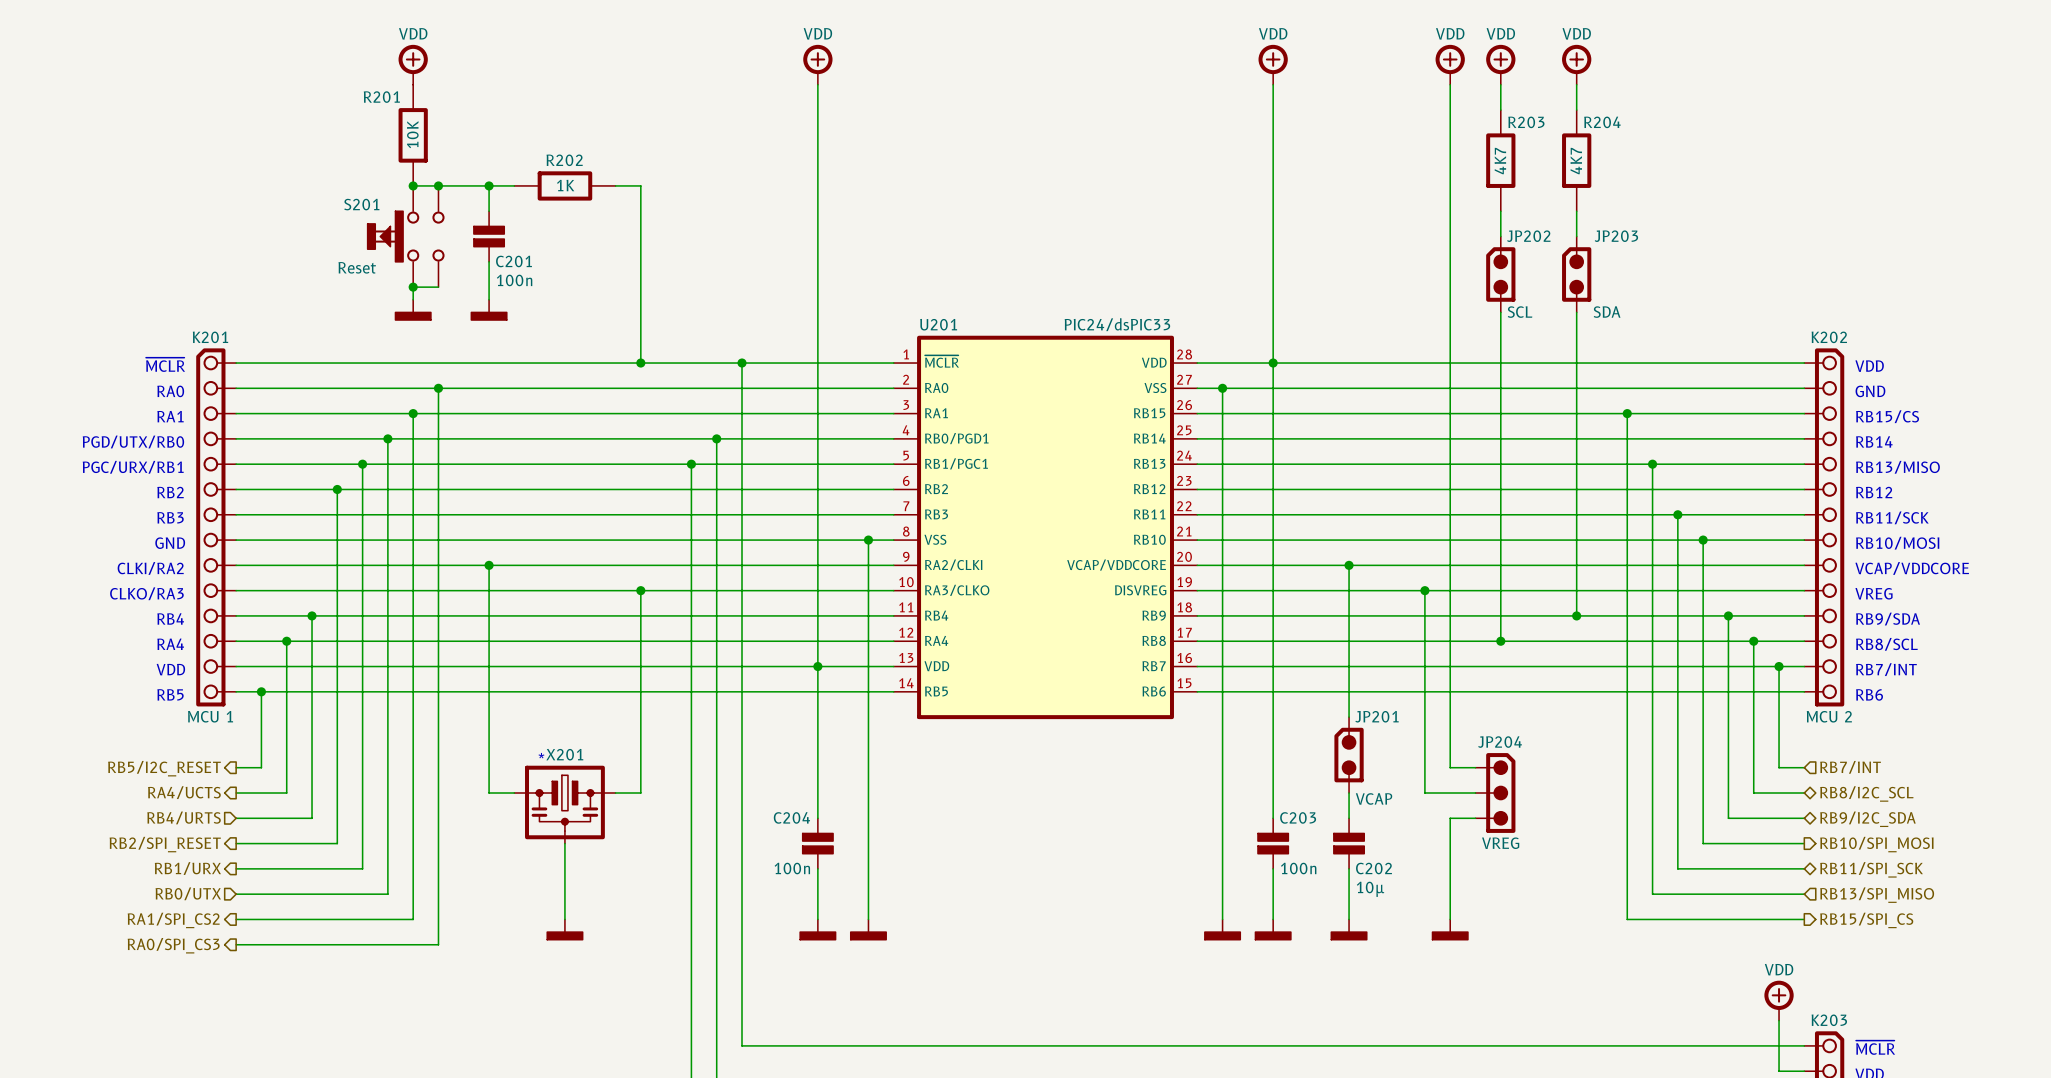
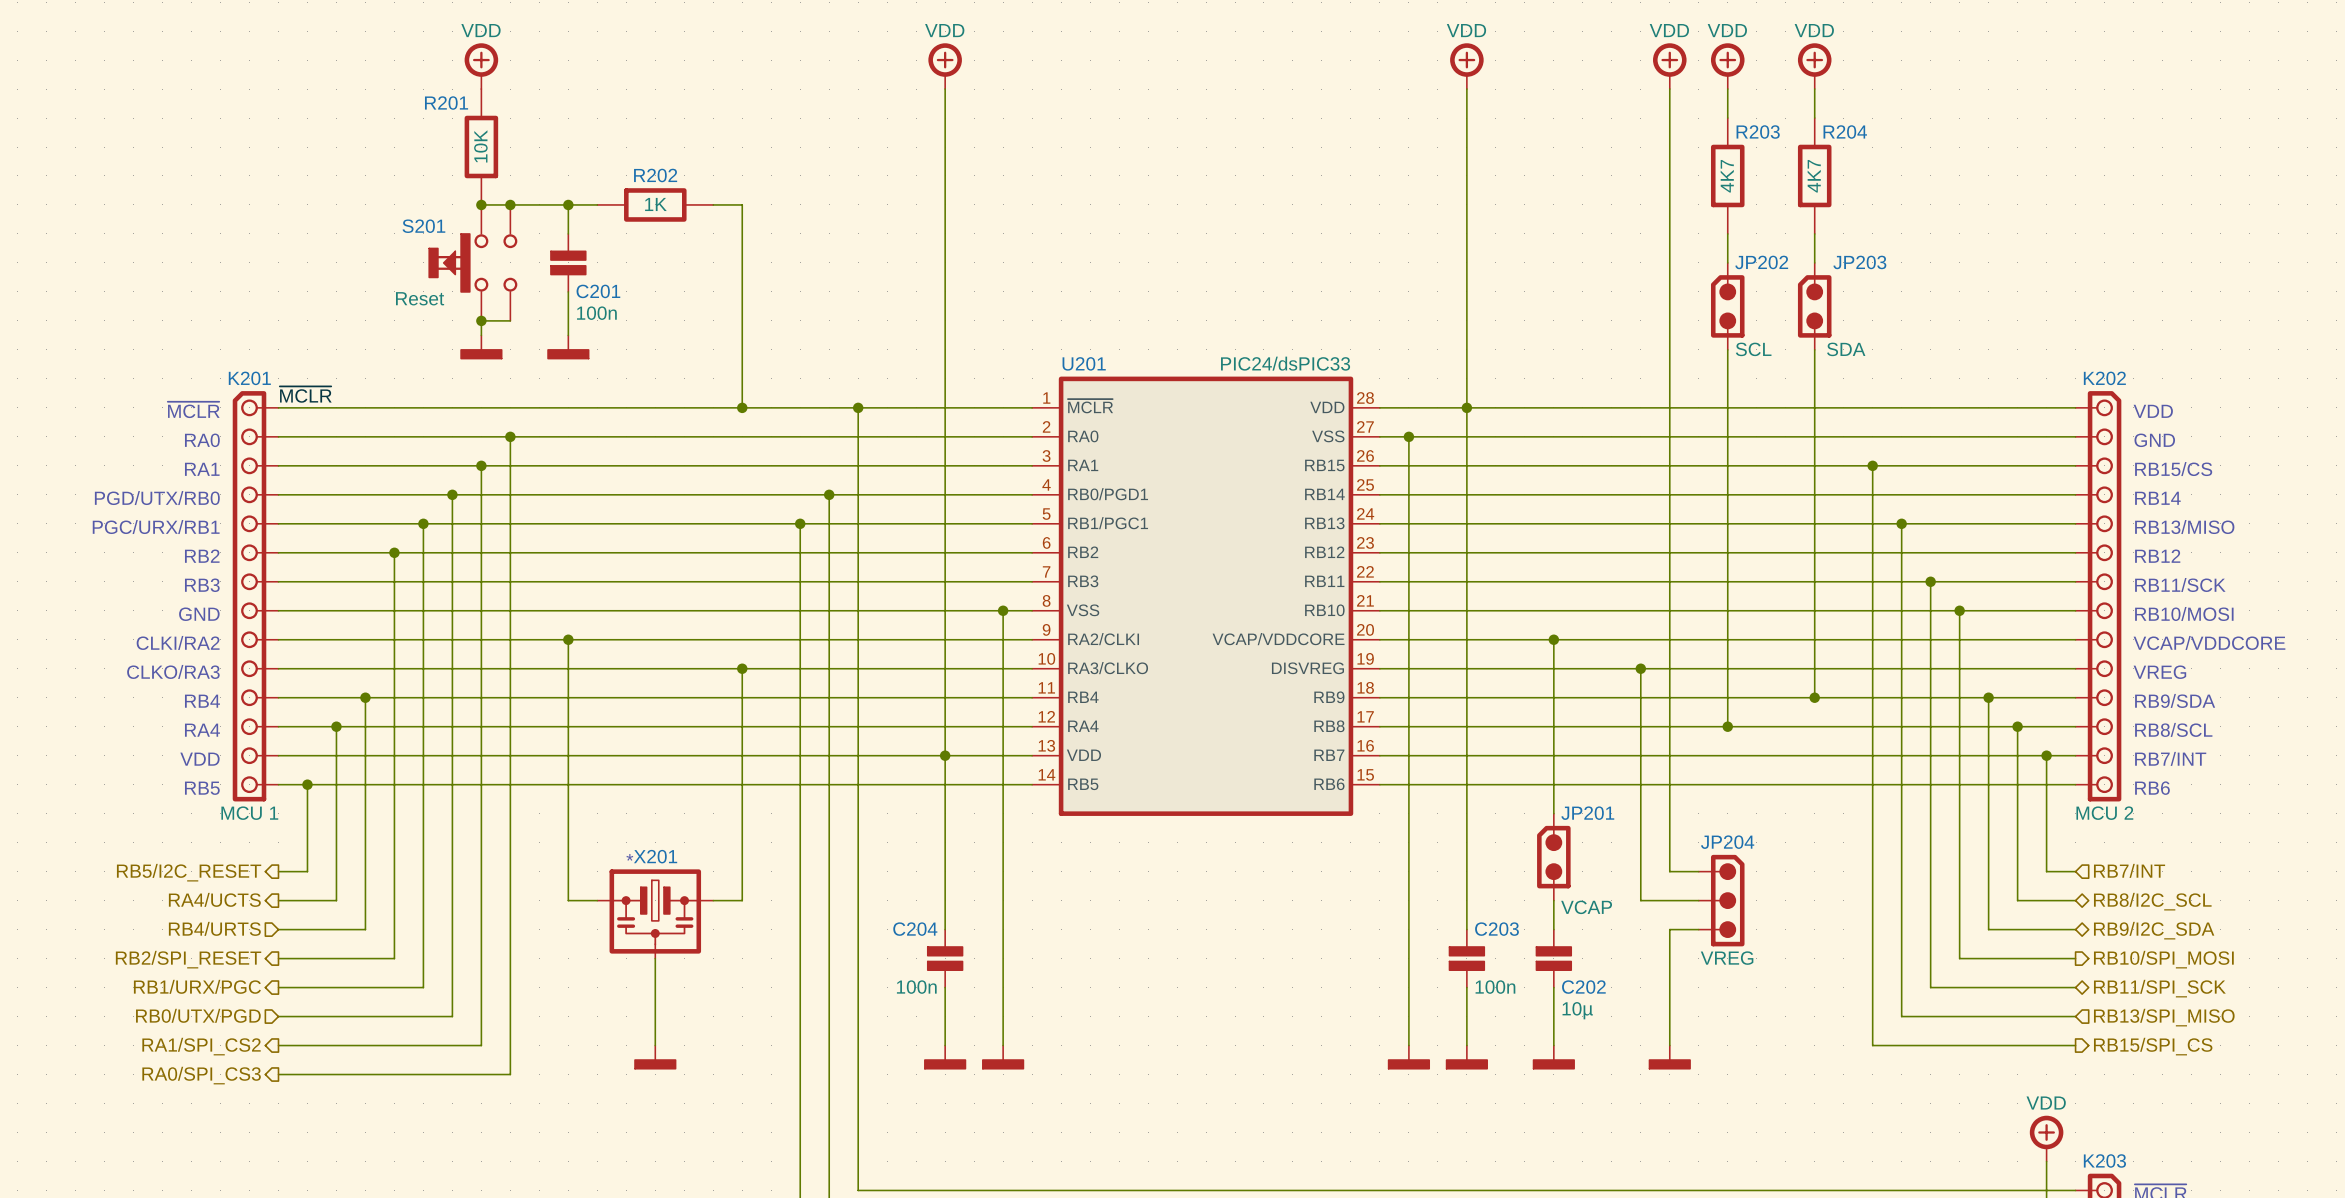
label: none -> ~{MCLR} (305, 394)
hierarchical label: RB1/URX (187, 868) -> RB1/URX/PGC (197, 986)
hierarchical label: RB0/UTX (188, 893) -> RB0/UTX/PGD (198, 1015)

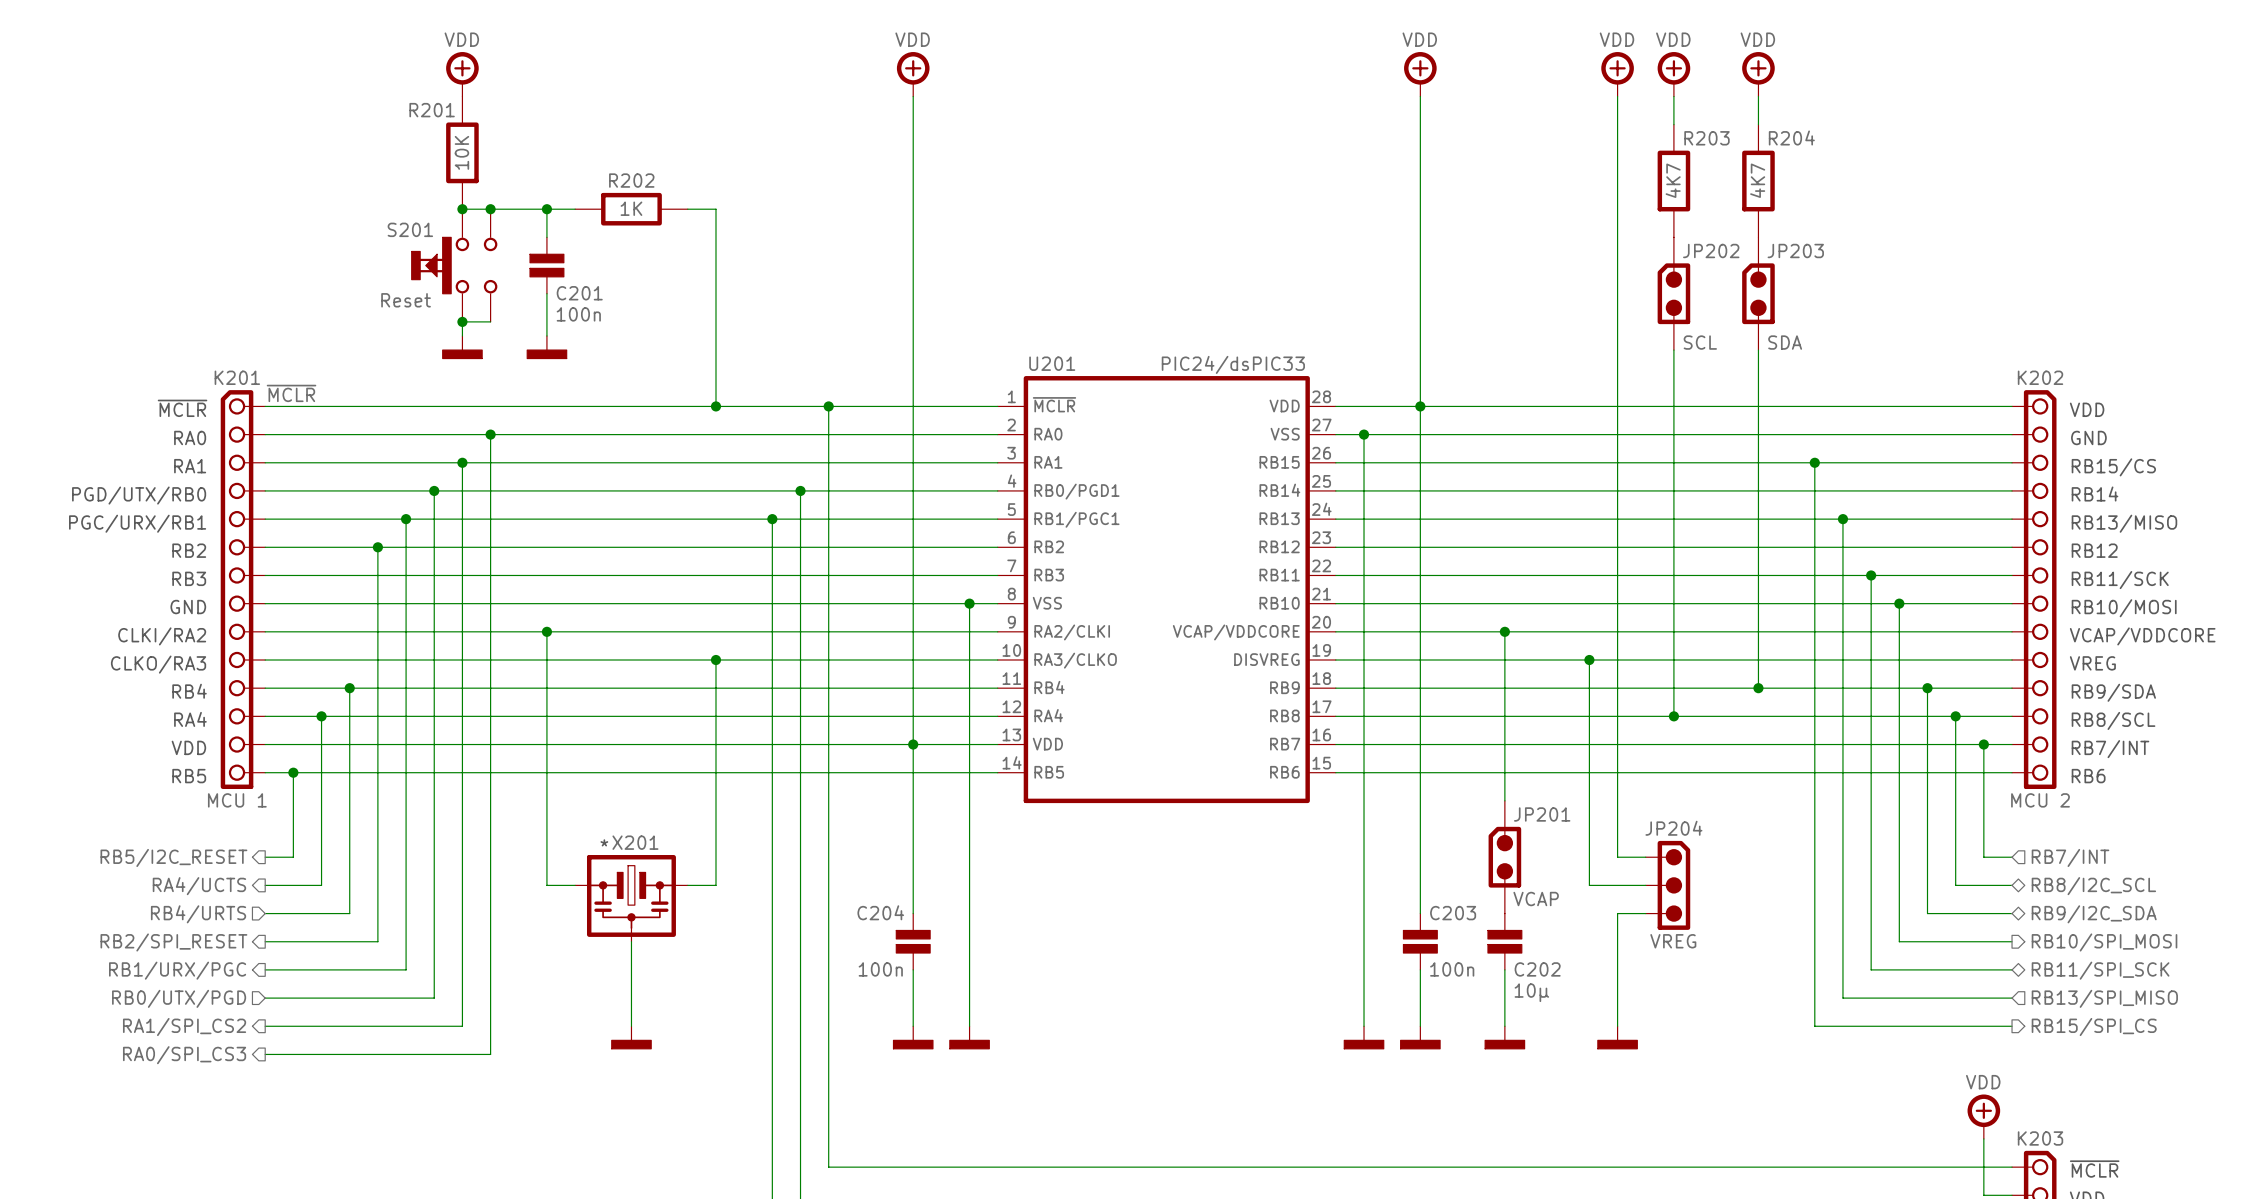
JP202 symbol: [1710, 262, 1745, 350] -> [1657, 237, 1691, 351]
JP203 symbol: [1797, 262, 1832, 350] -> [1742, 237, 1775, 351]
JP201 symbol: [1537, 813, 1571, 901] -> [1488, 800, 1522, 914]

